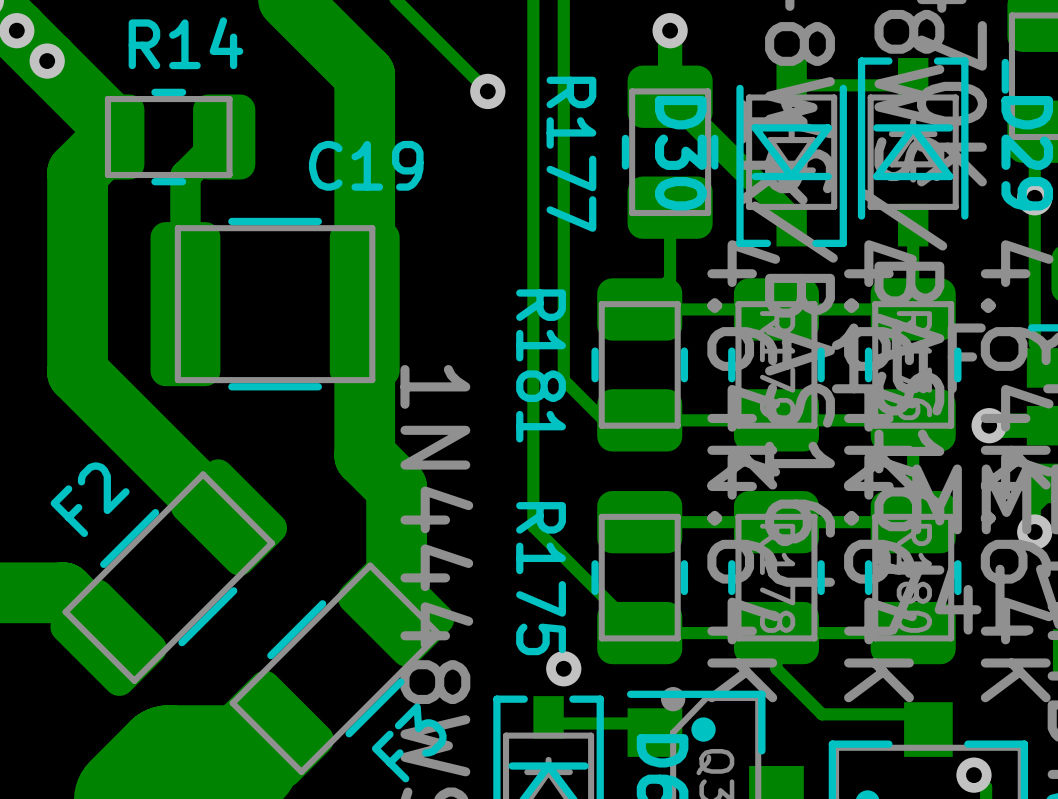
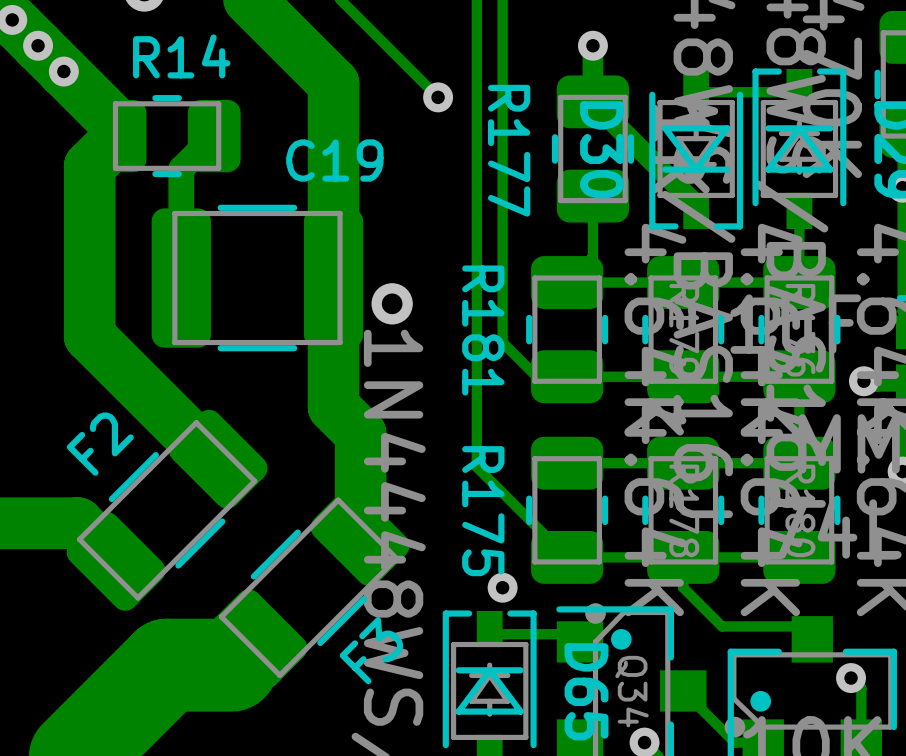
via: none -> (392, 303)

